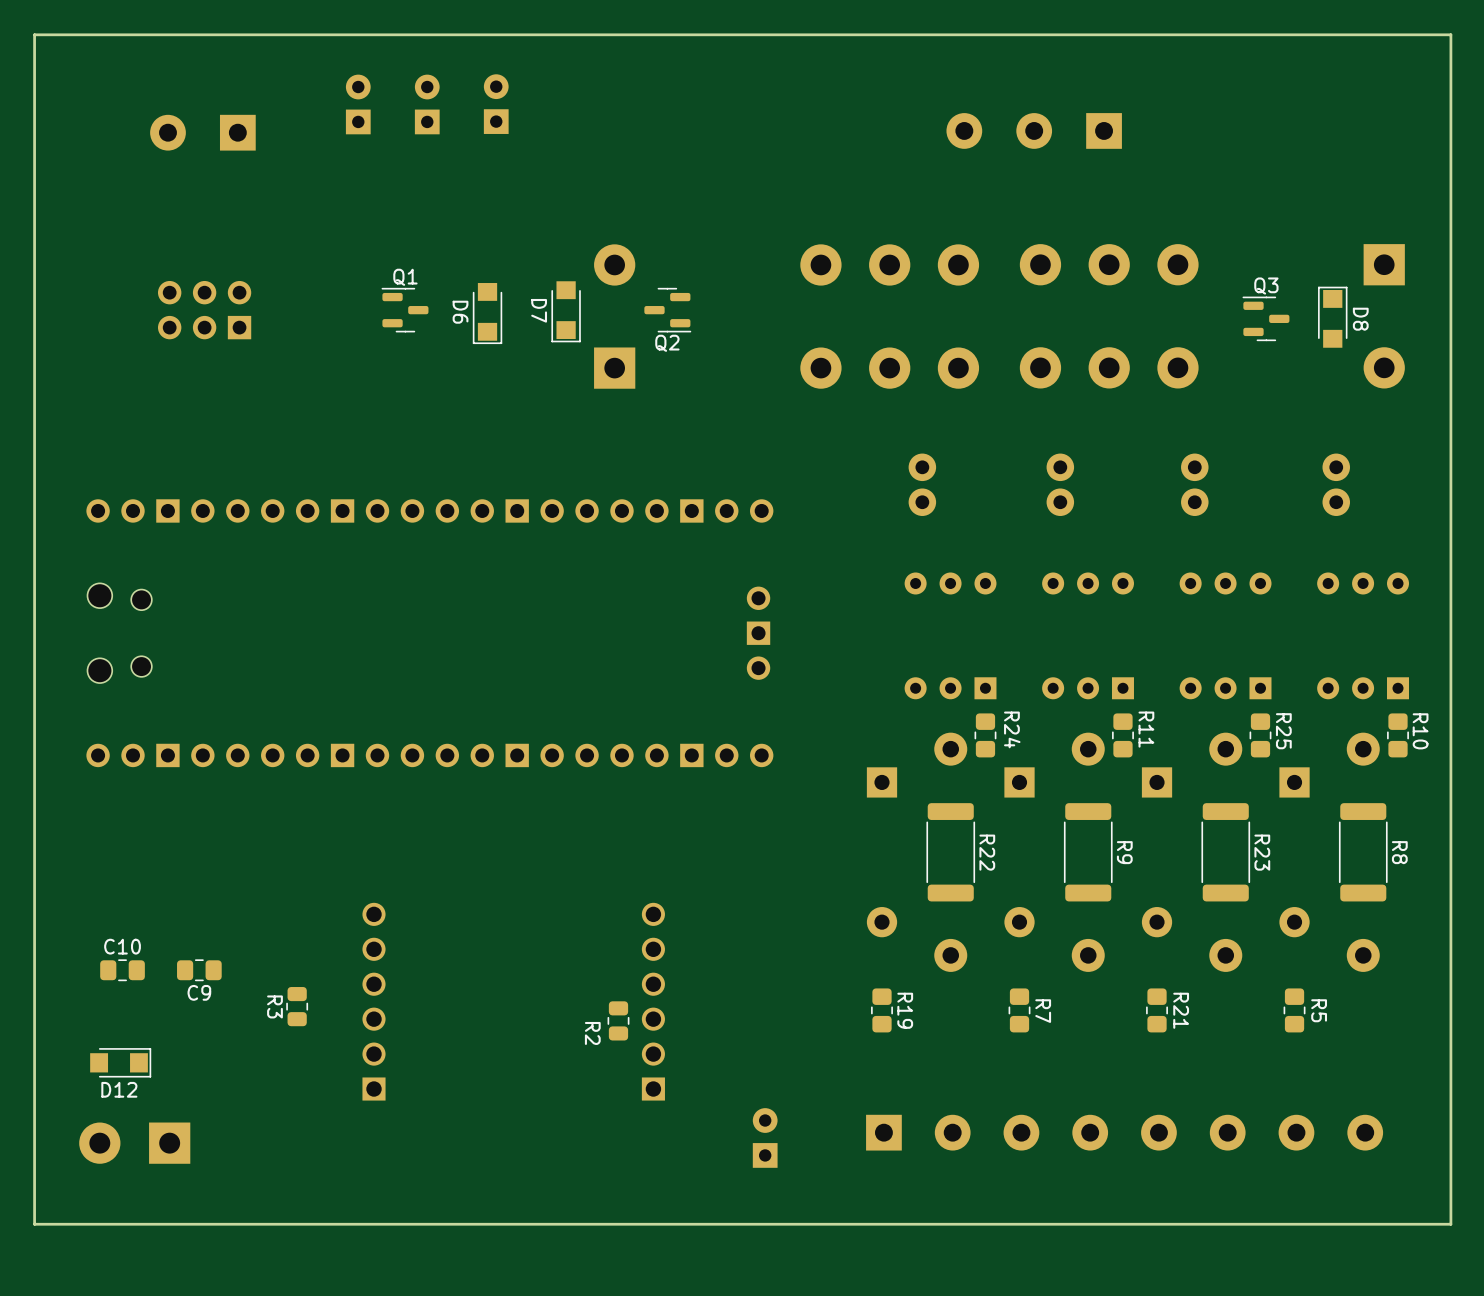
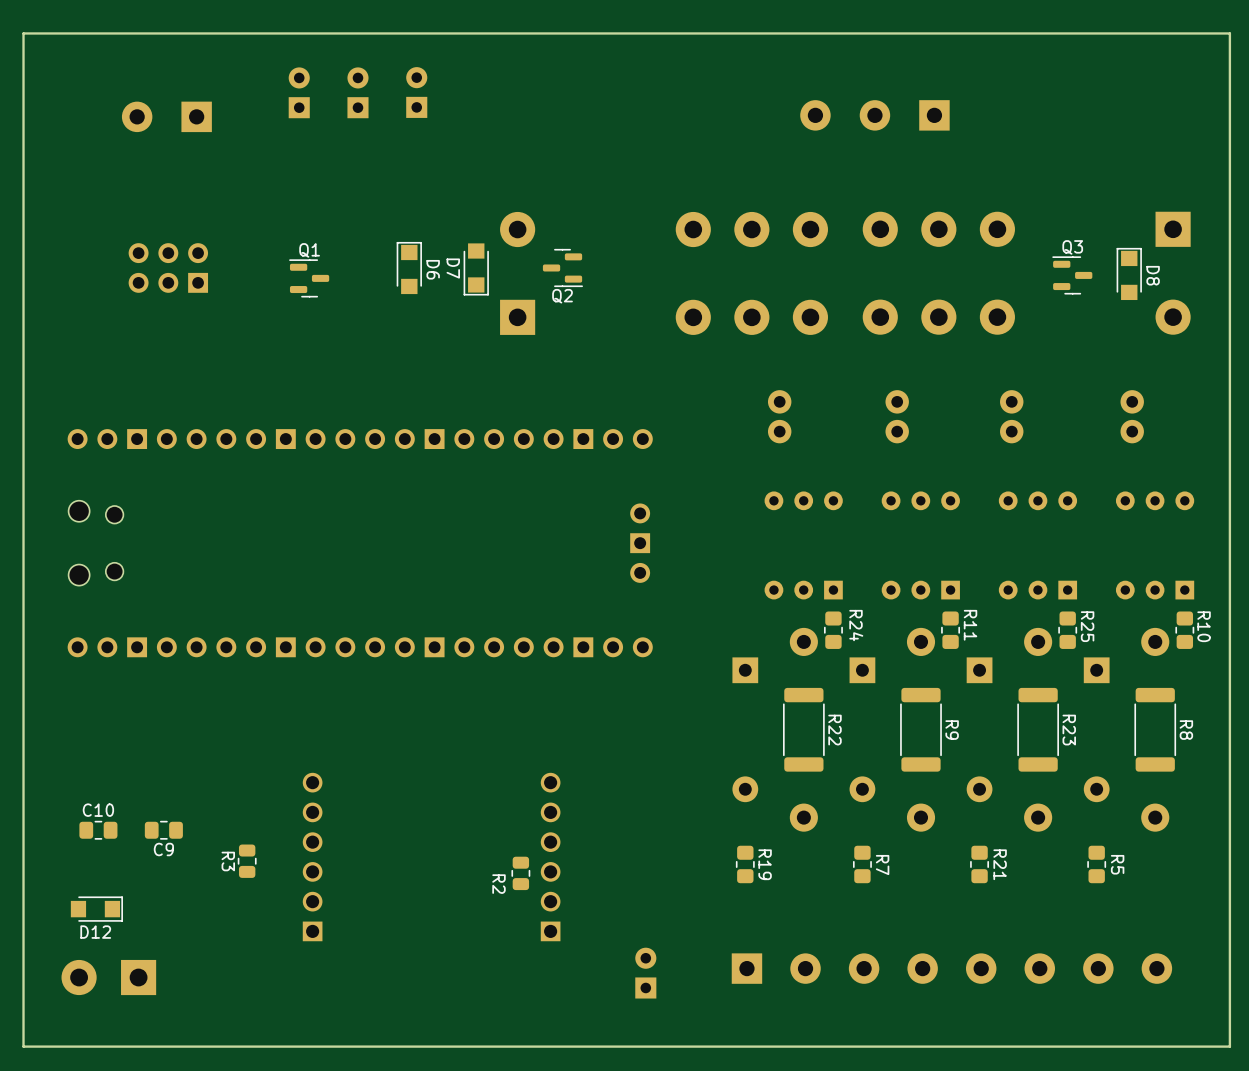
Q1 position: (405, 310) -> (309, 278)
D6 rotation: 0° (487, 313) -> 180° (409, 268)

